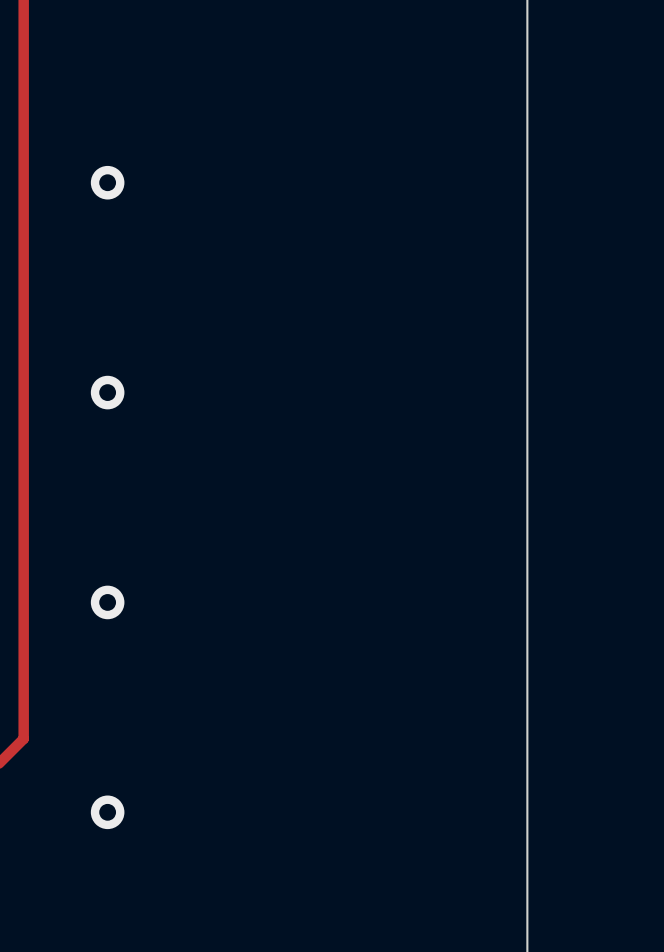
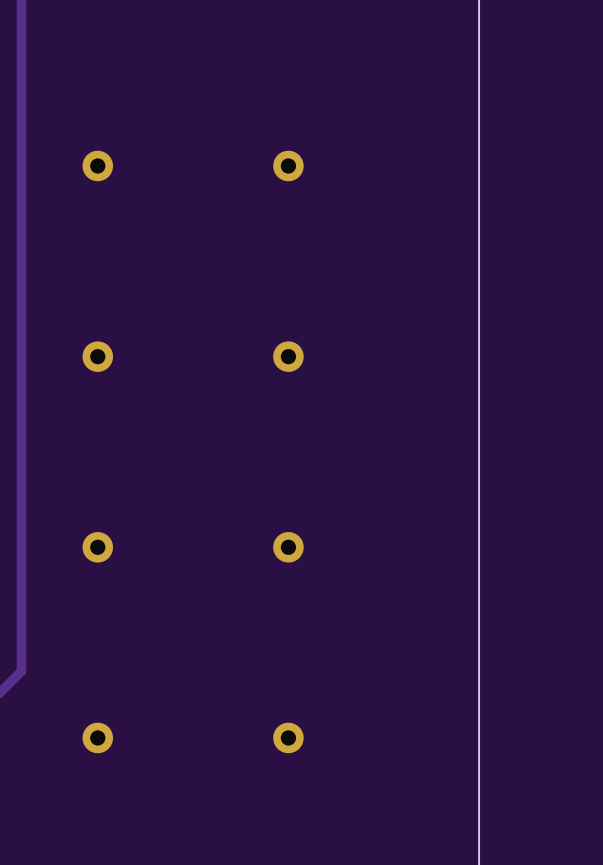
via: none -> (288, 165)
via: none -> (288, 356)
via: none -> (288, 547)
via: none -> (288, 737)

